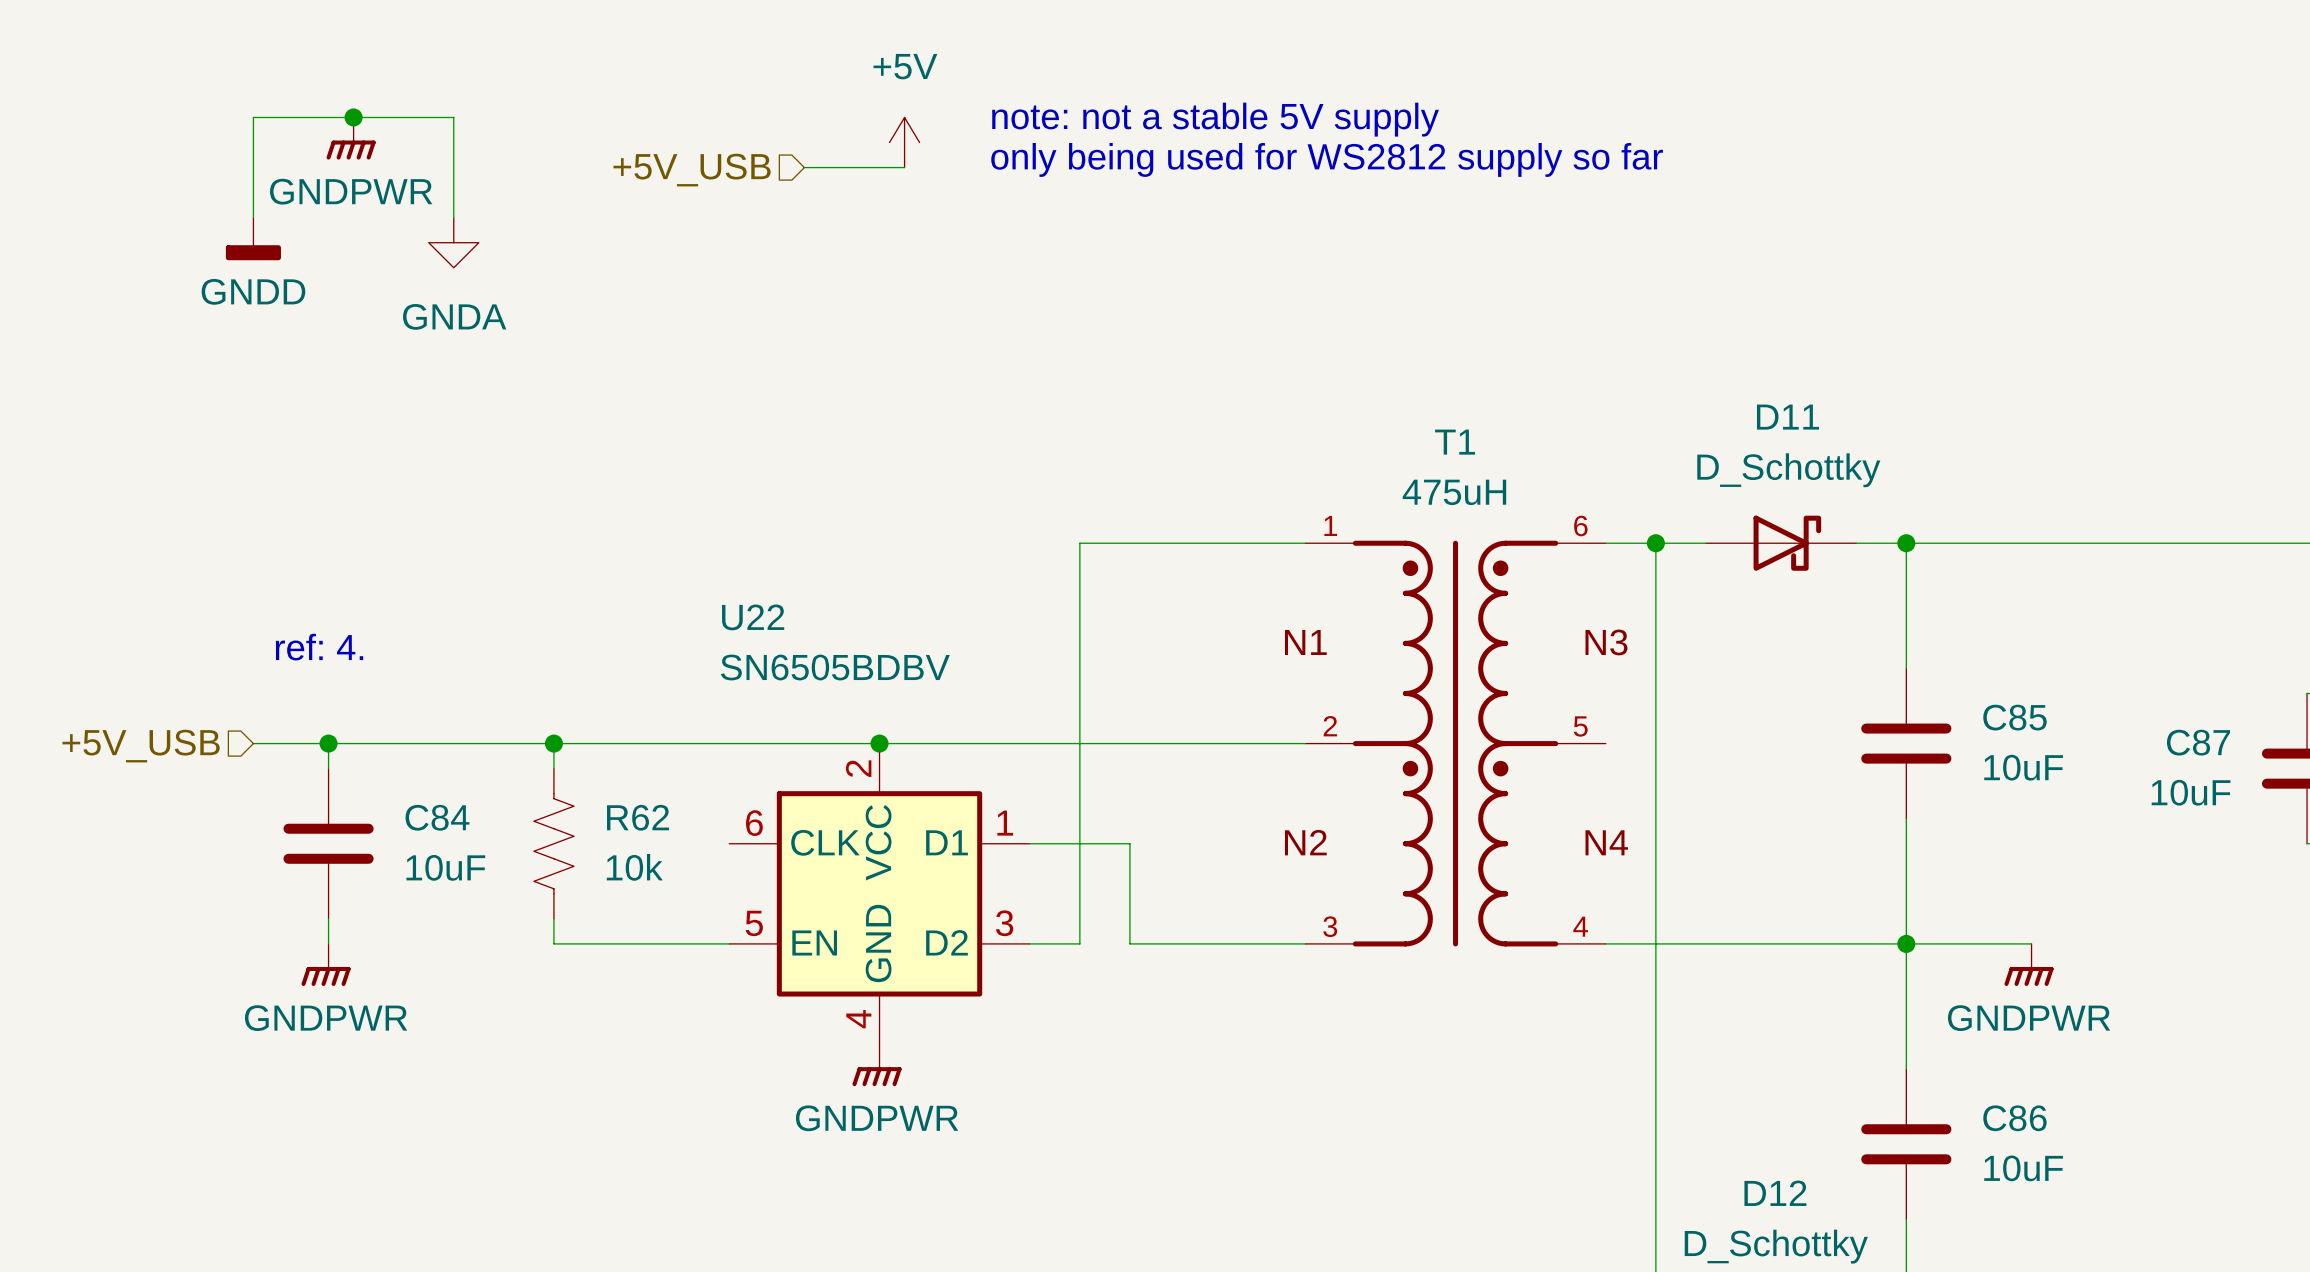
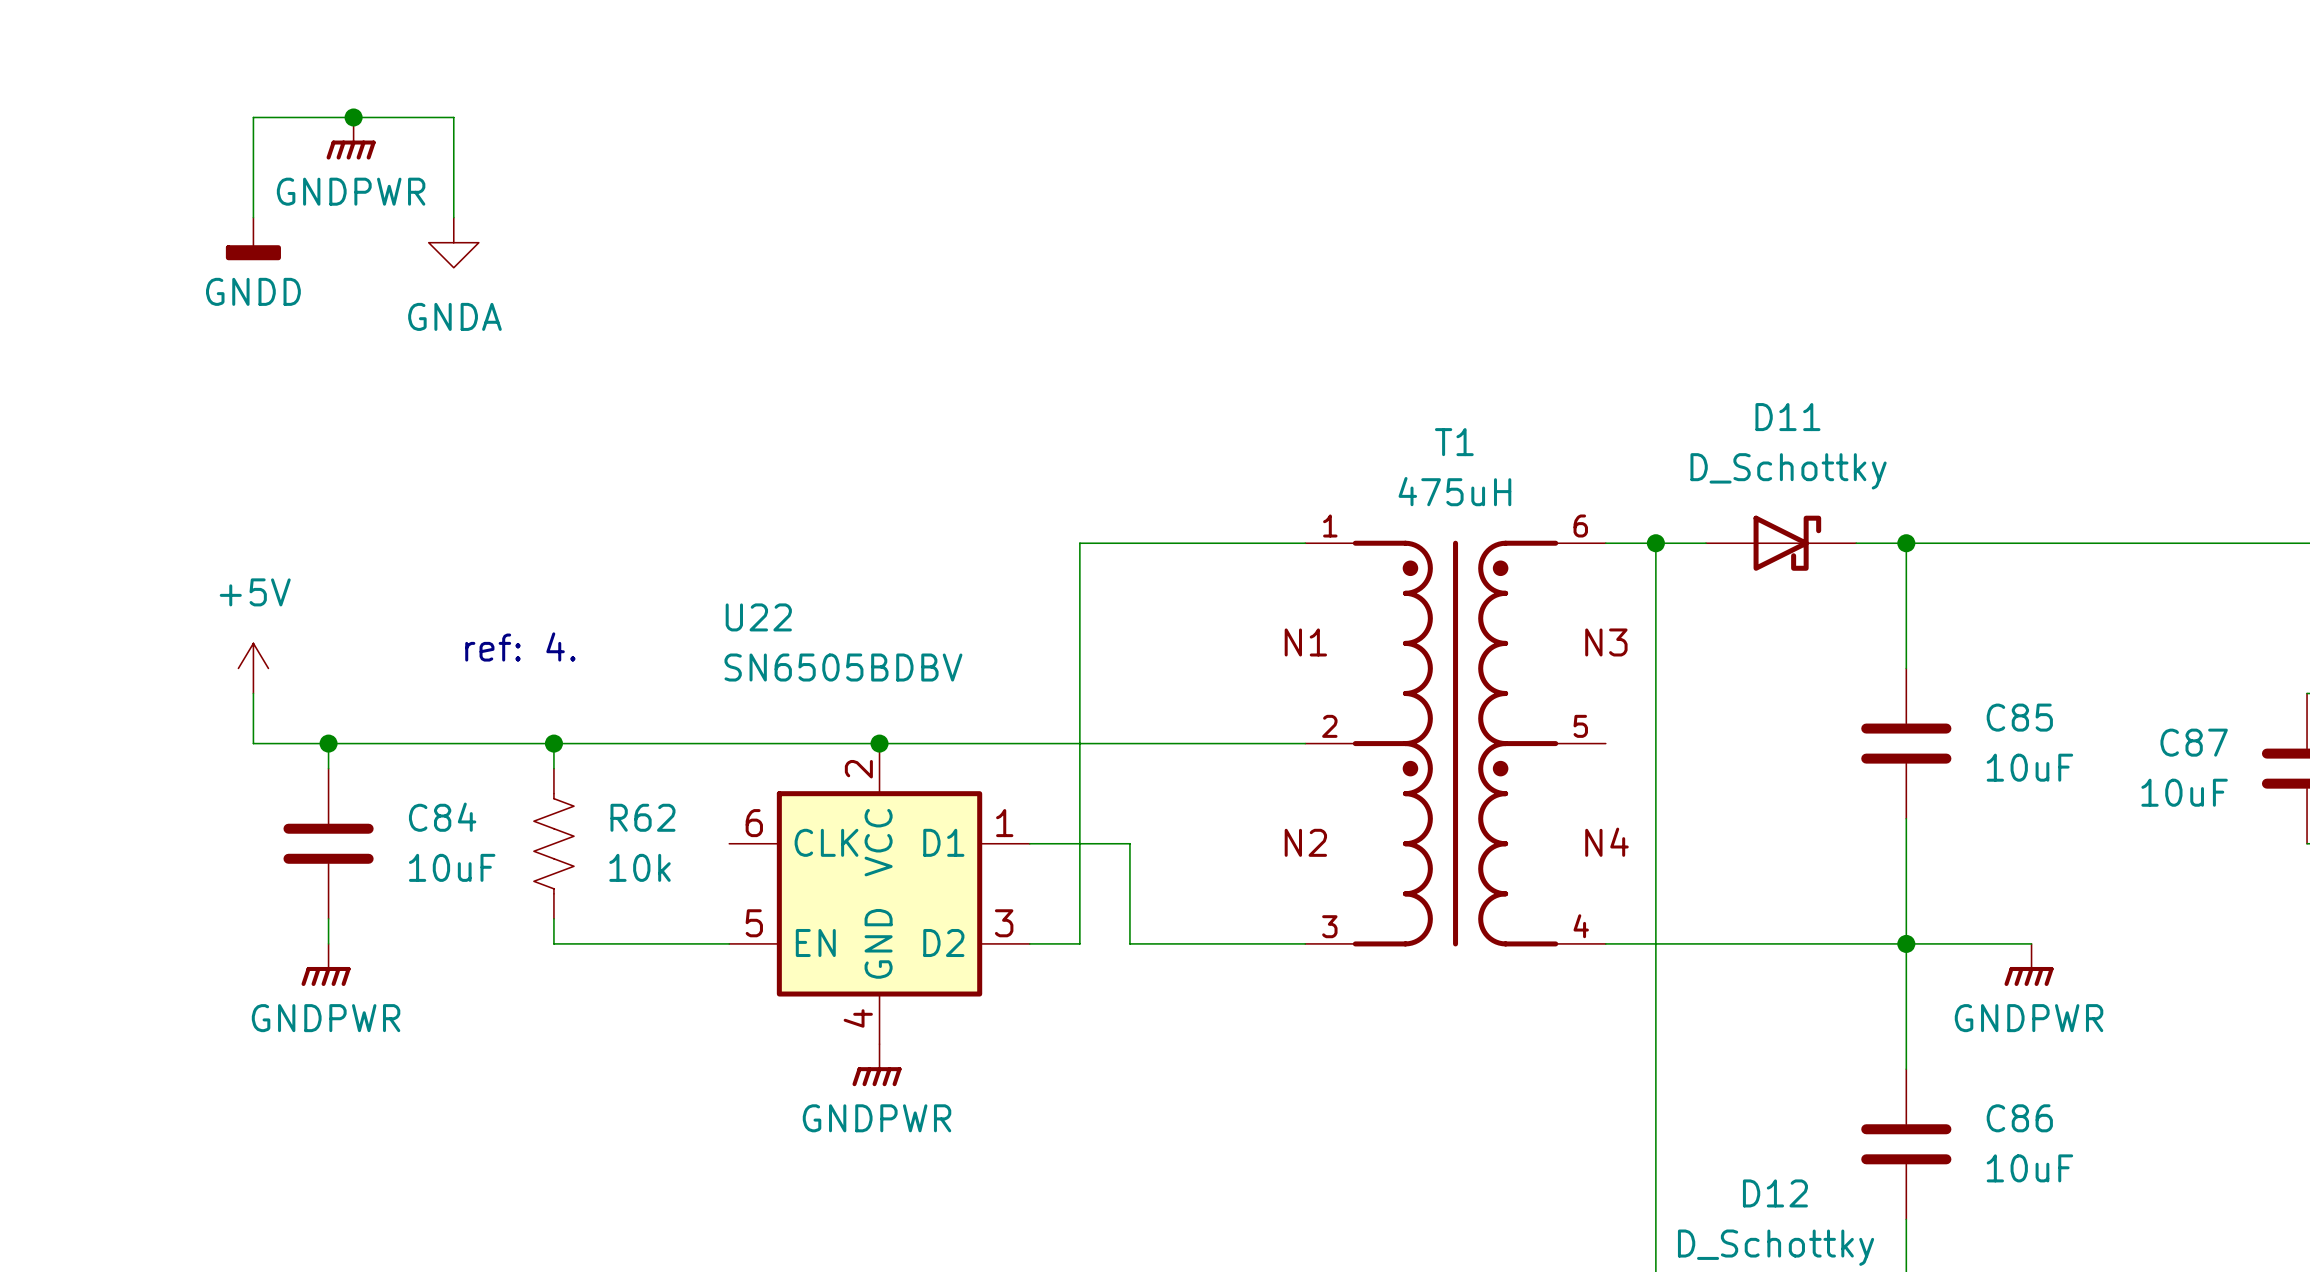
text: note: not a stable 5V supply (1215, 119) -> none
power symbol: +5V (904, 142) -> none
text: only being used for WS2812 supply so far (1327, 159) -> none
wire: (804, 167) (904, 167) -> none
hierarchical label: +5V_USB (692, 170) -> none
text position: ref: 4. (319, 647) -> ref: 4. (520, 646)
power symbol: none -> +5V (253, 668)
wire: none -> (253, 693) (253, 743)
hierarchical label: +5V_USB (141, 746) -> none

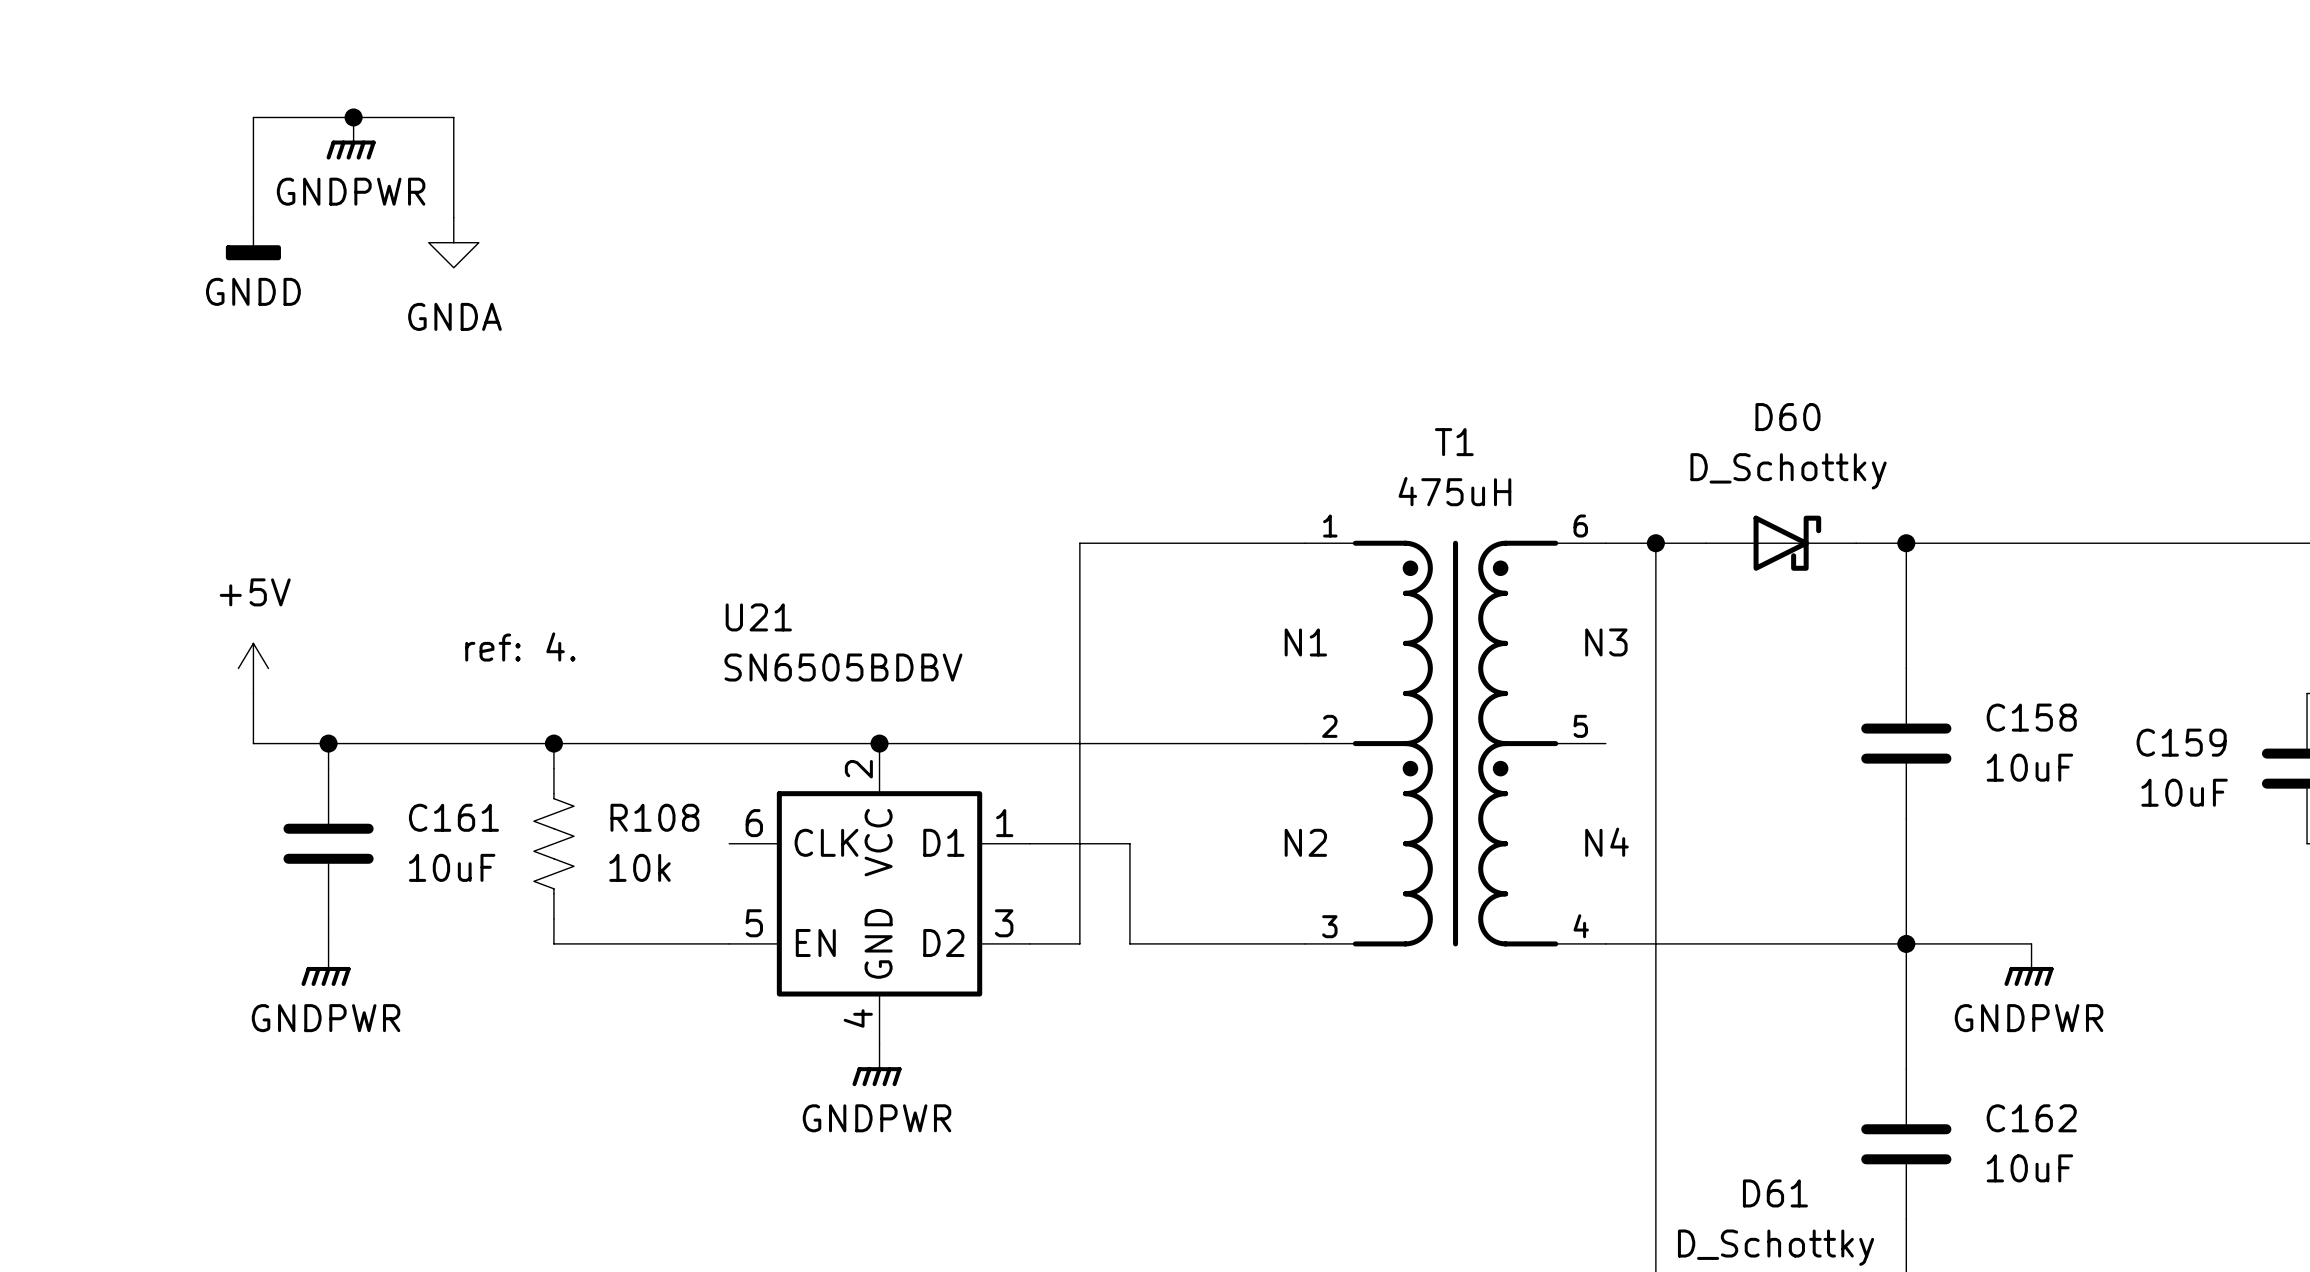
D11 name: D11 (1787, 417) -> D60 (1787, 417)
U22 name: U22 (758, 617) -> U21 (758, 617)
C85 name: C85 (2019, 717) -> C158 (2031, 717)
C87 name: C87 (2194, 742) -> C159 (2181, 742)
C84 name: C84 (442, 817) -> C161 (453, 817)
R62 name: R62 (642, 817) -> R108 (654, 817)
C86 name: C86 (2019, 1118) -> C162 (2031, 1118)
D12 name: D12 (1775, 1193) -> D61 (1775, 1193)

